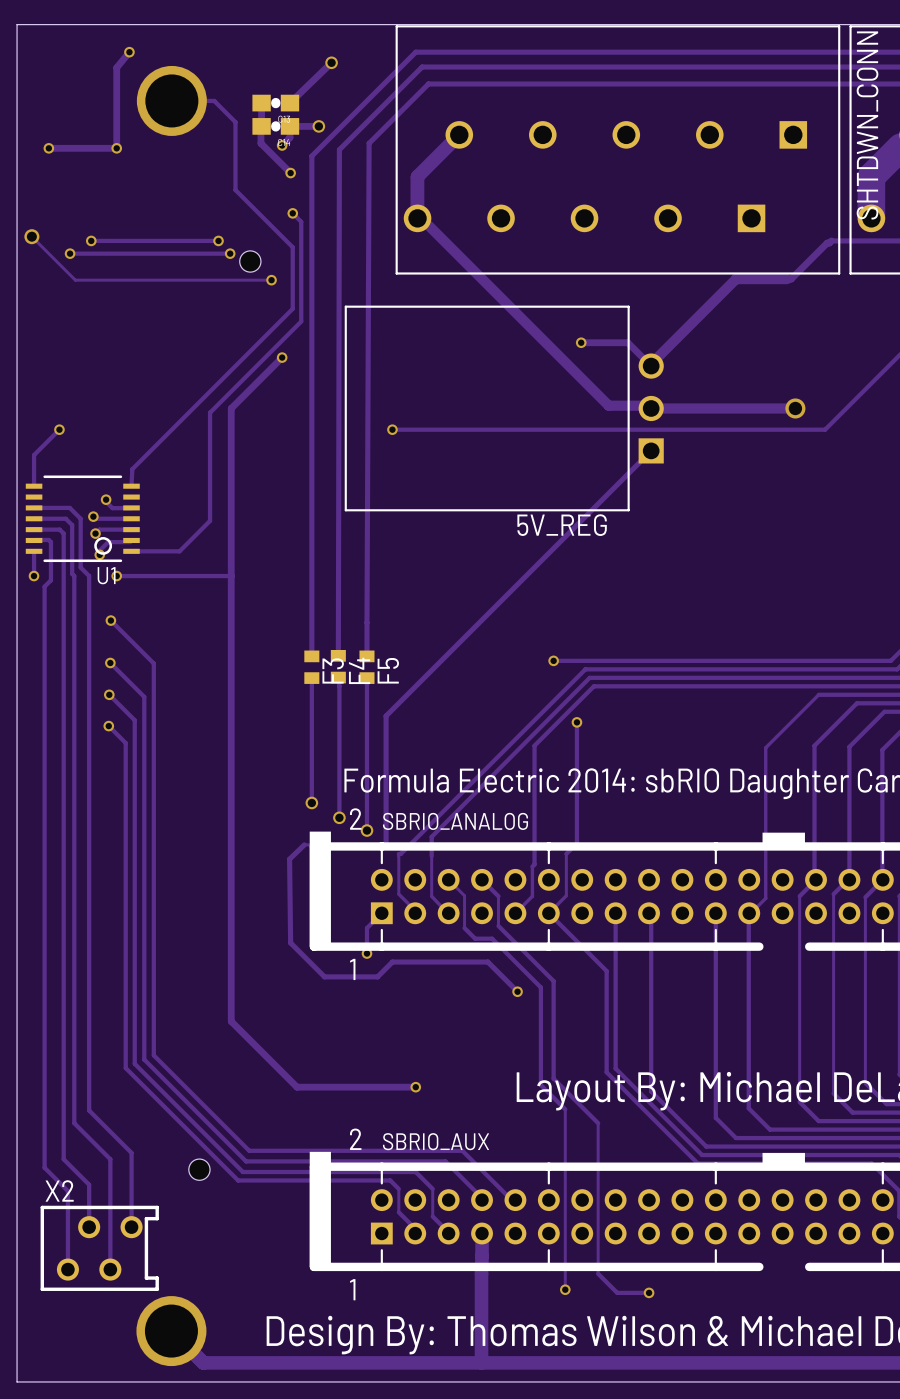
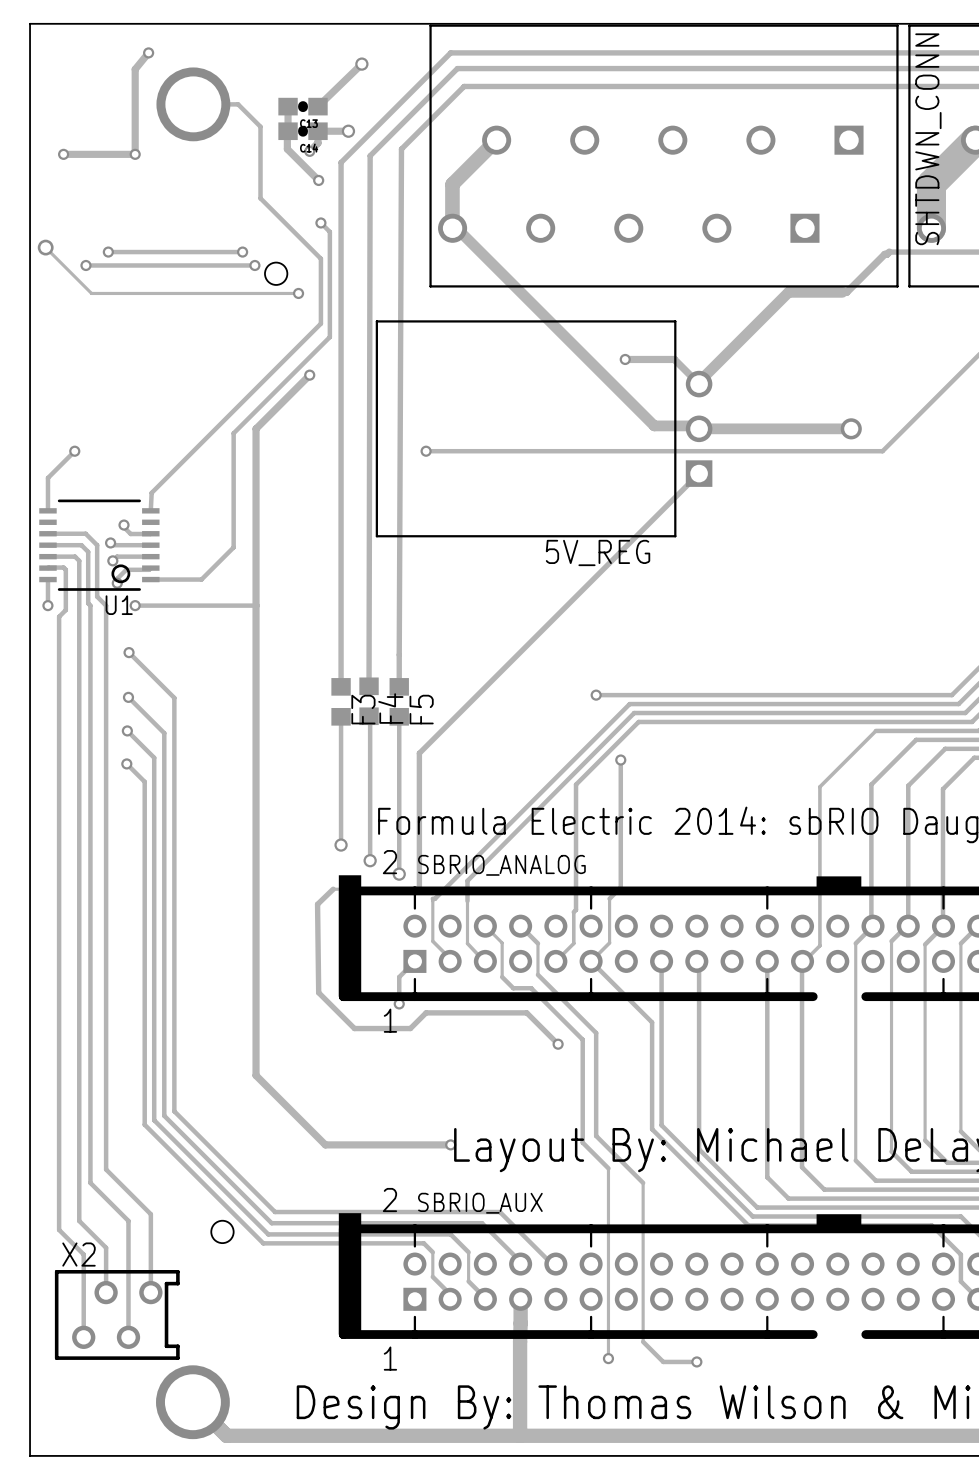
F3 footprint: [304, 650, 320, 684] -> [331, 678, 351, 726]
F4 footprint: [330, 650, 346, 684] -> [359, 677, 379, 726]
F5 footprint: [359, 650, 375, 684] -> [389, 678, 409, 726]

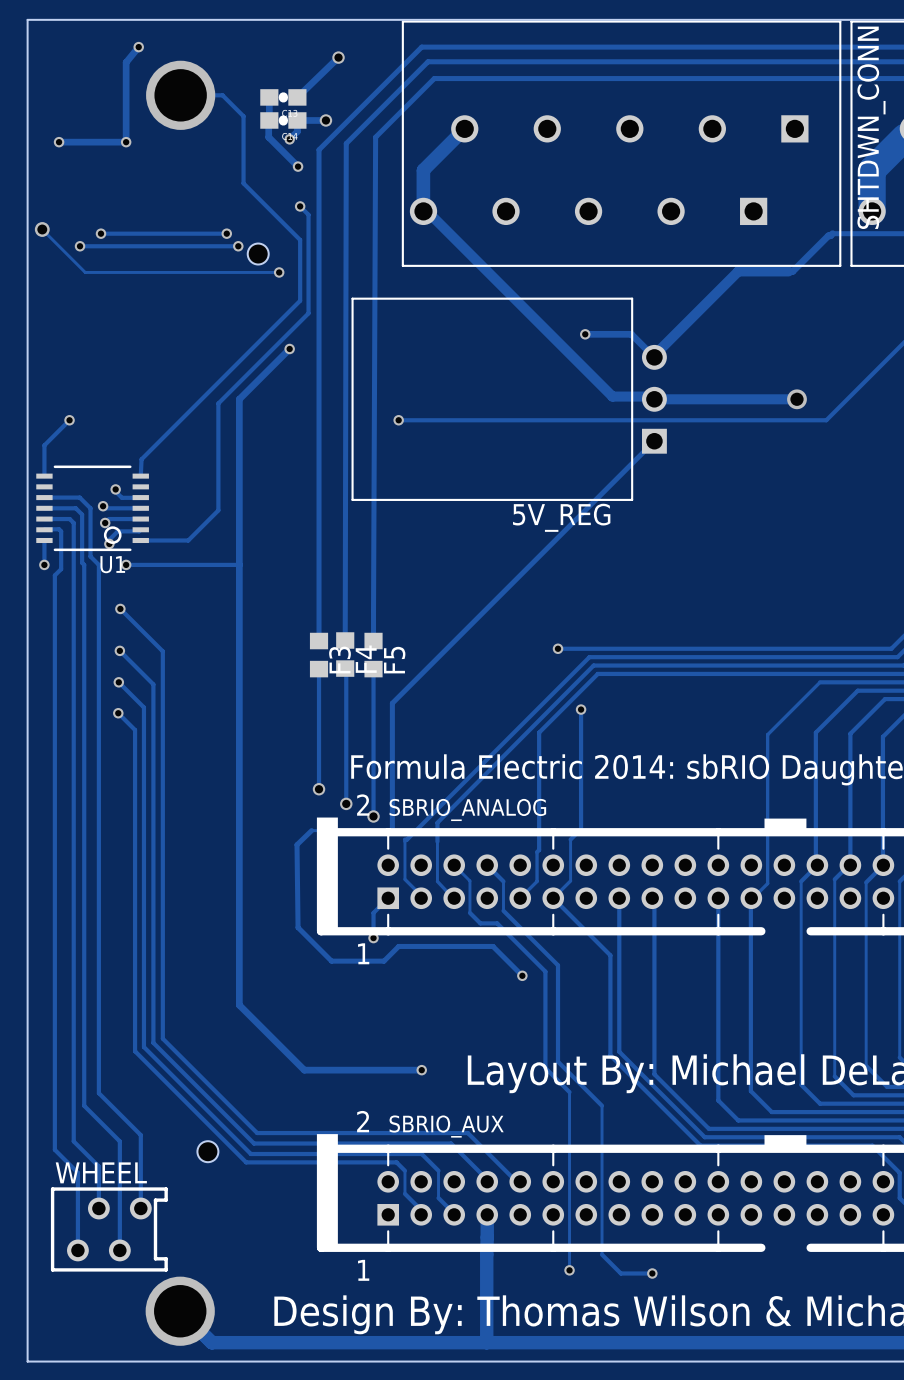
X2 name: X2 (78, 1254) -> WHEEL (101, 1172)

